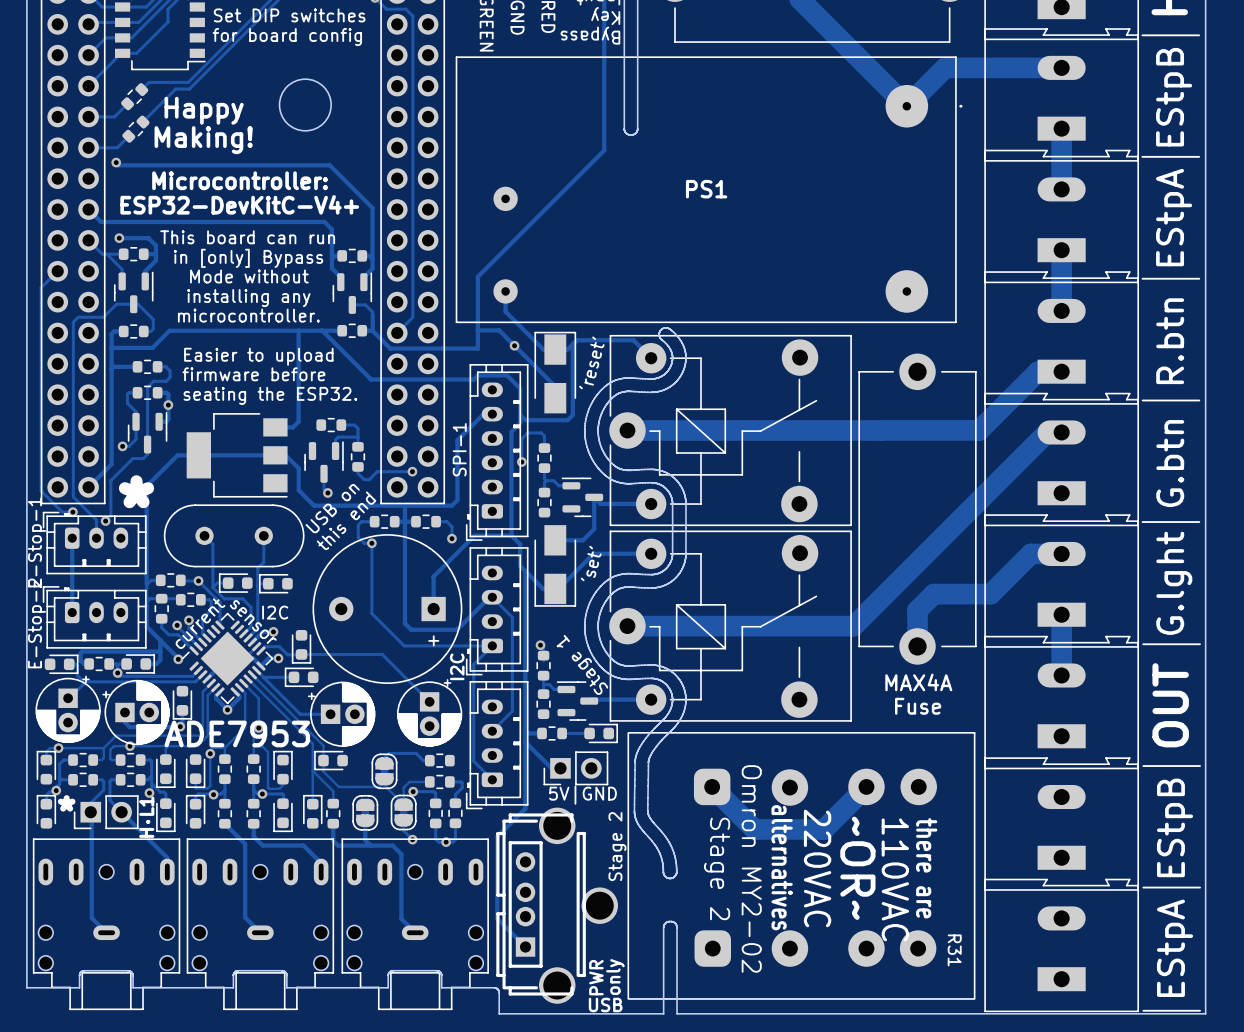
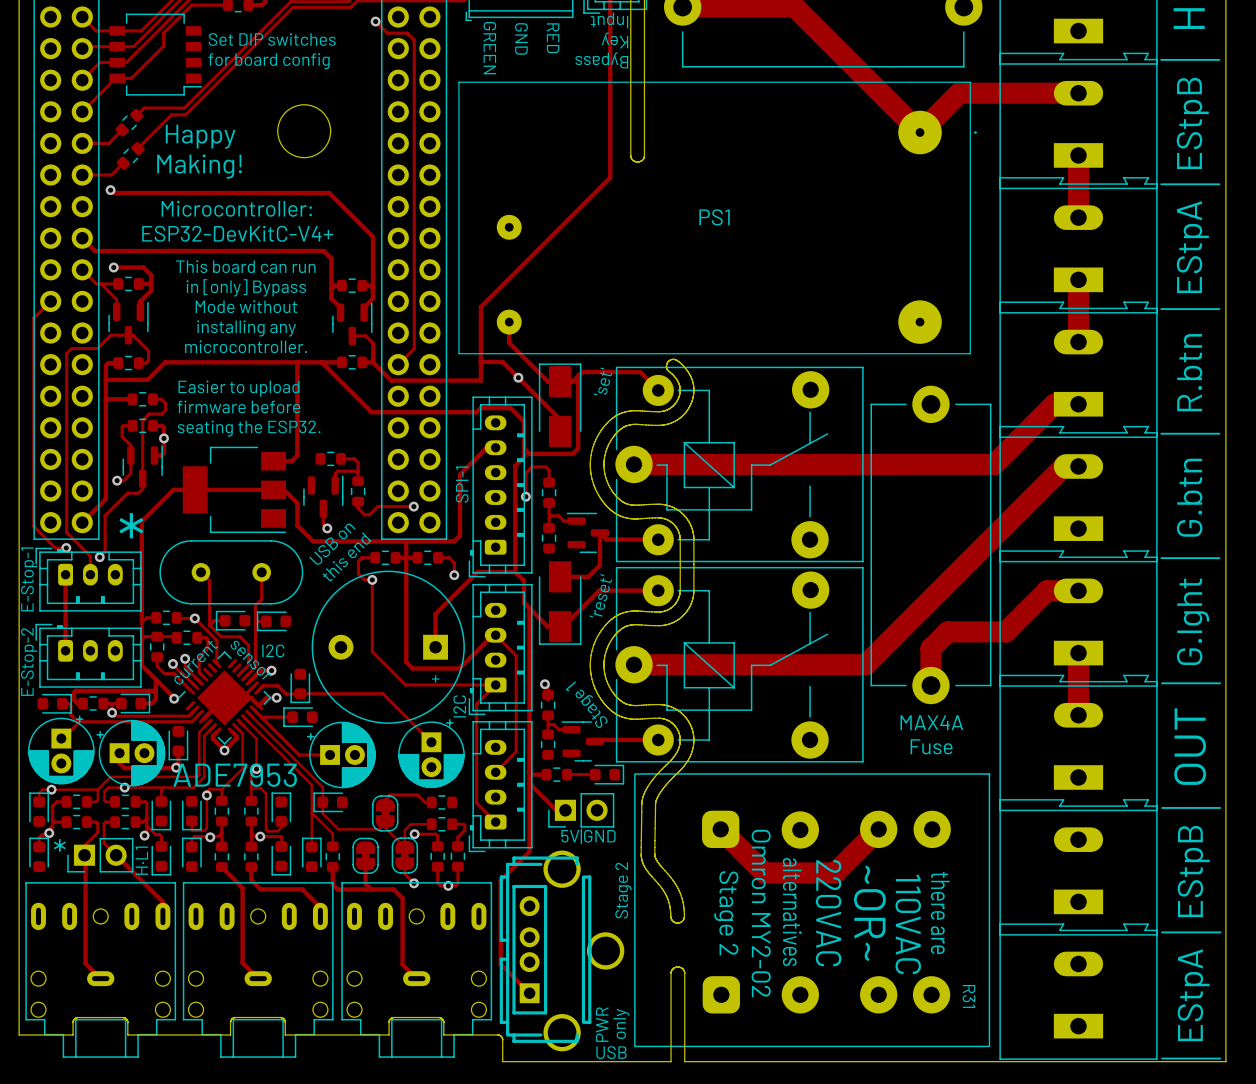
text position: 'reset' (591, 362) -> 'reset' (600, 595)
text position: 'set' (591, 563) -> 'set' (602, 381)

